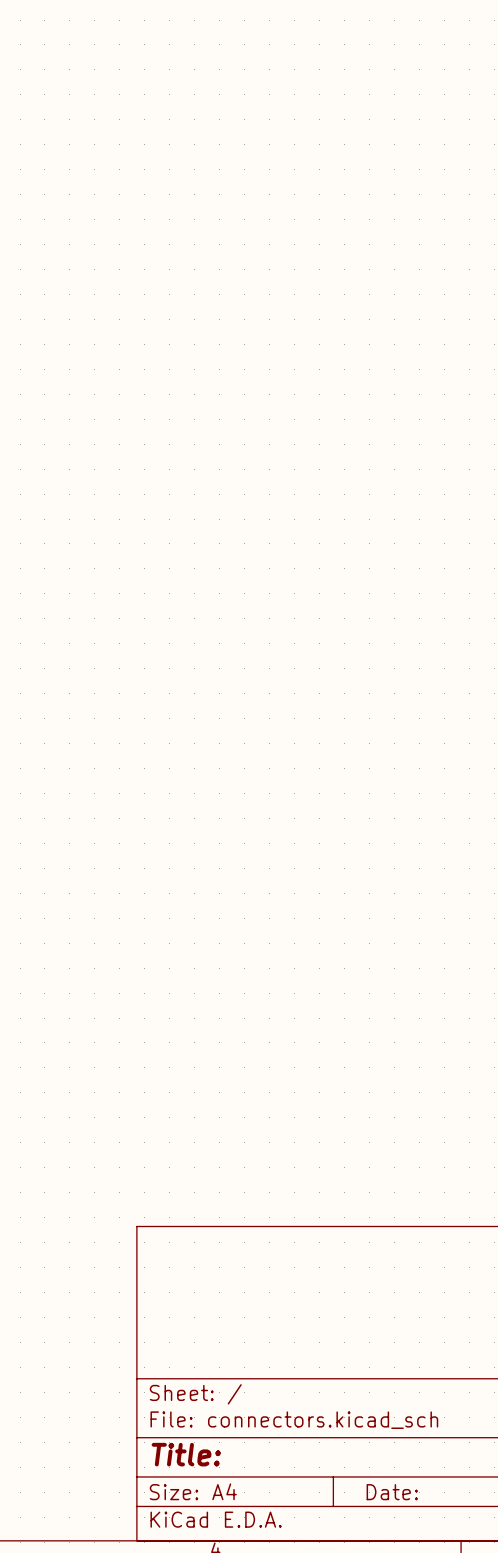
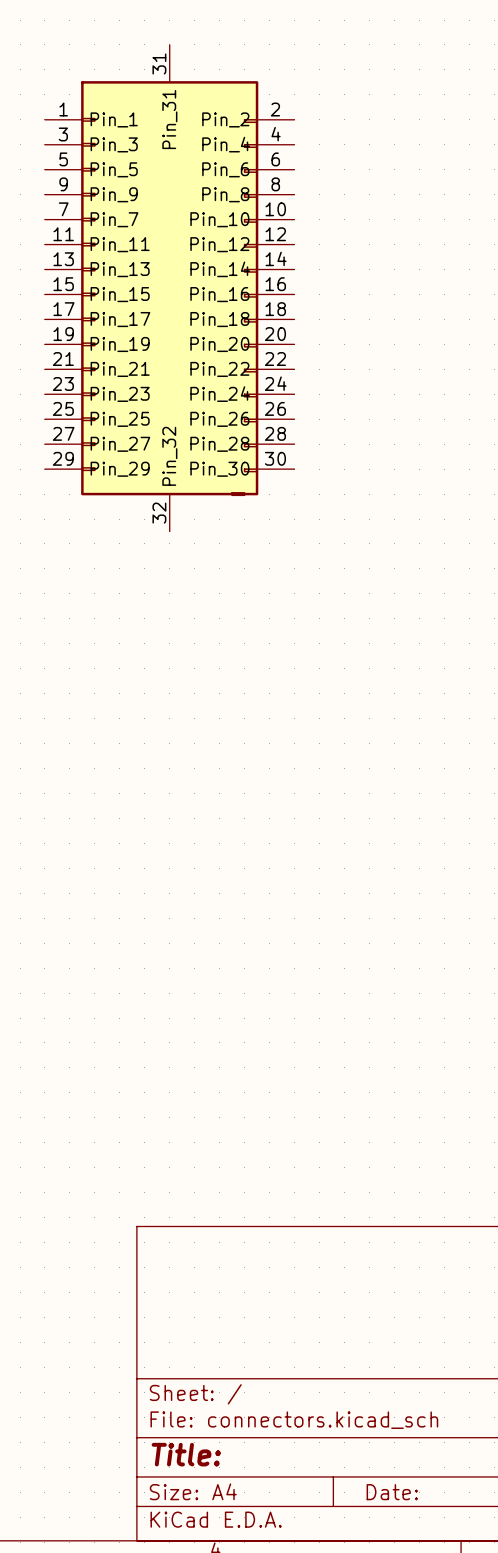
part: none -> (169, 288)

